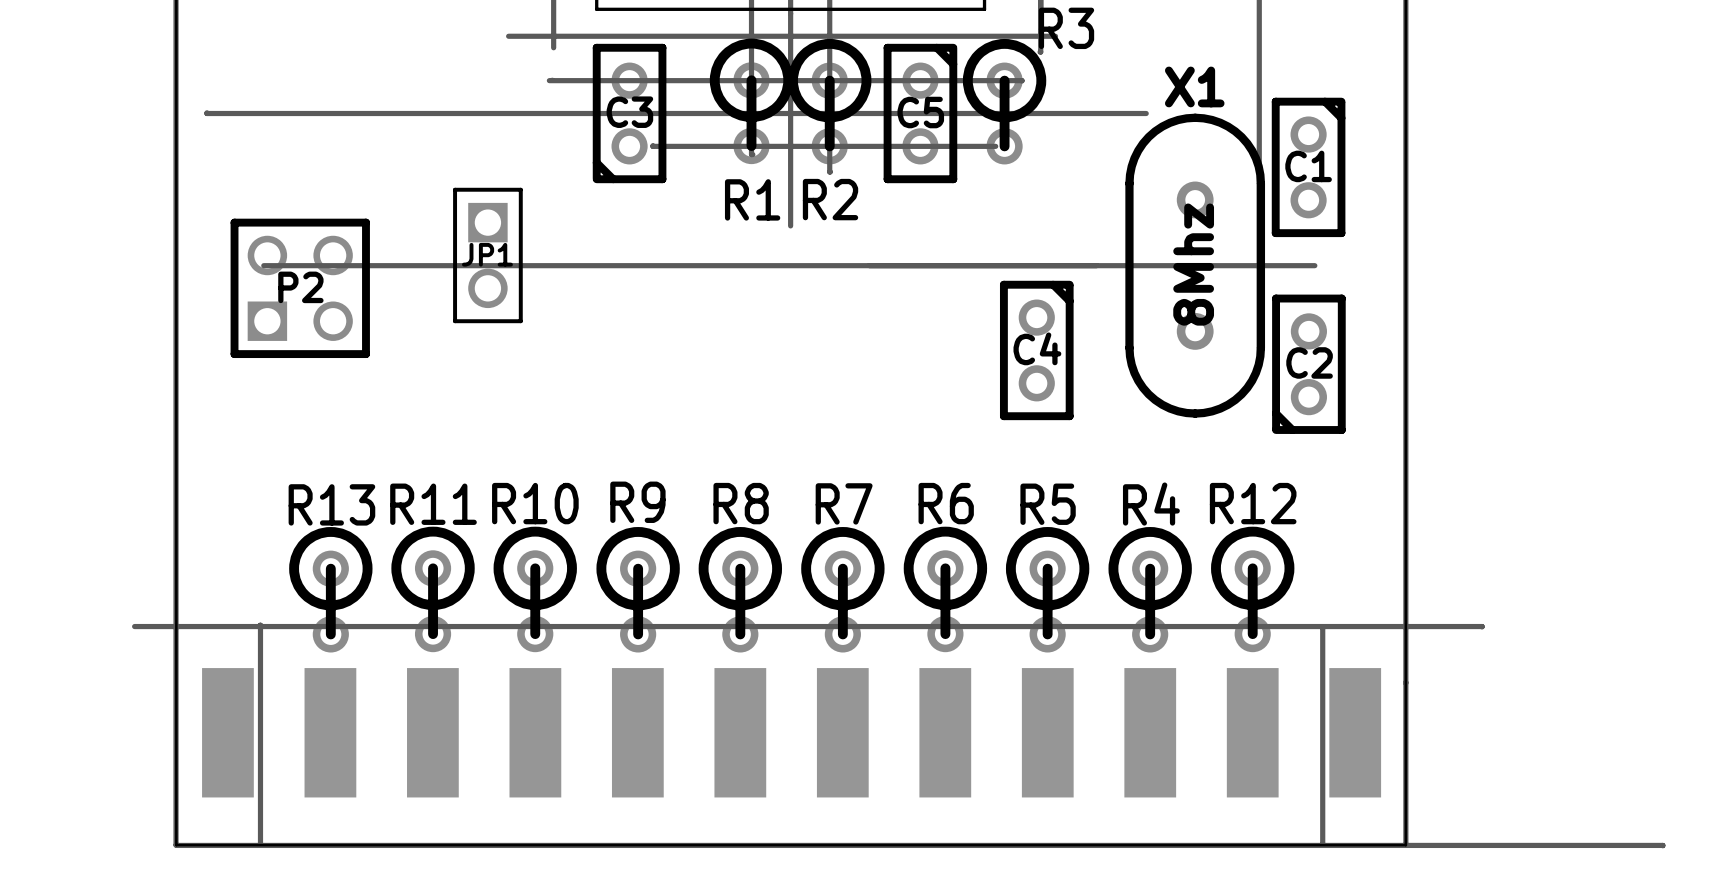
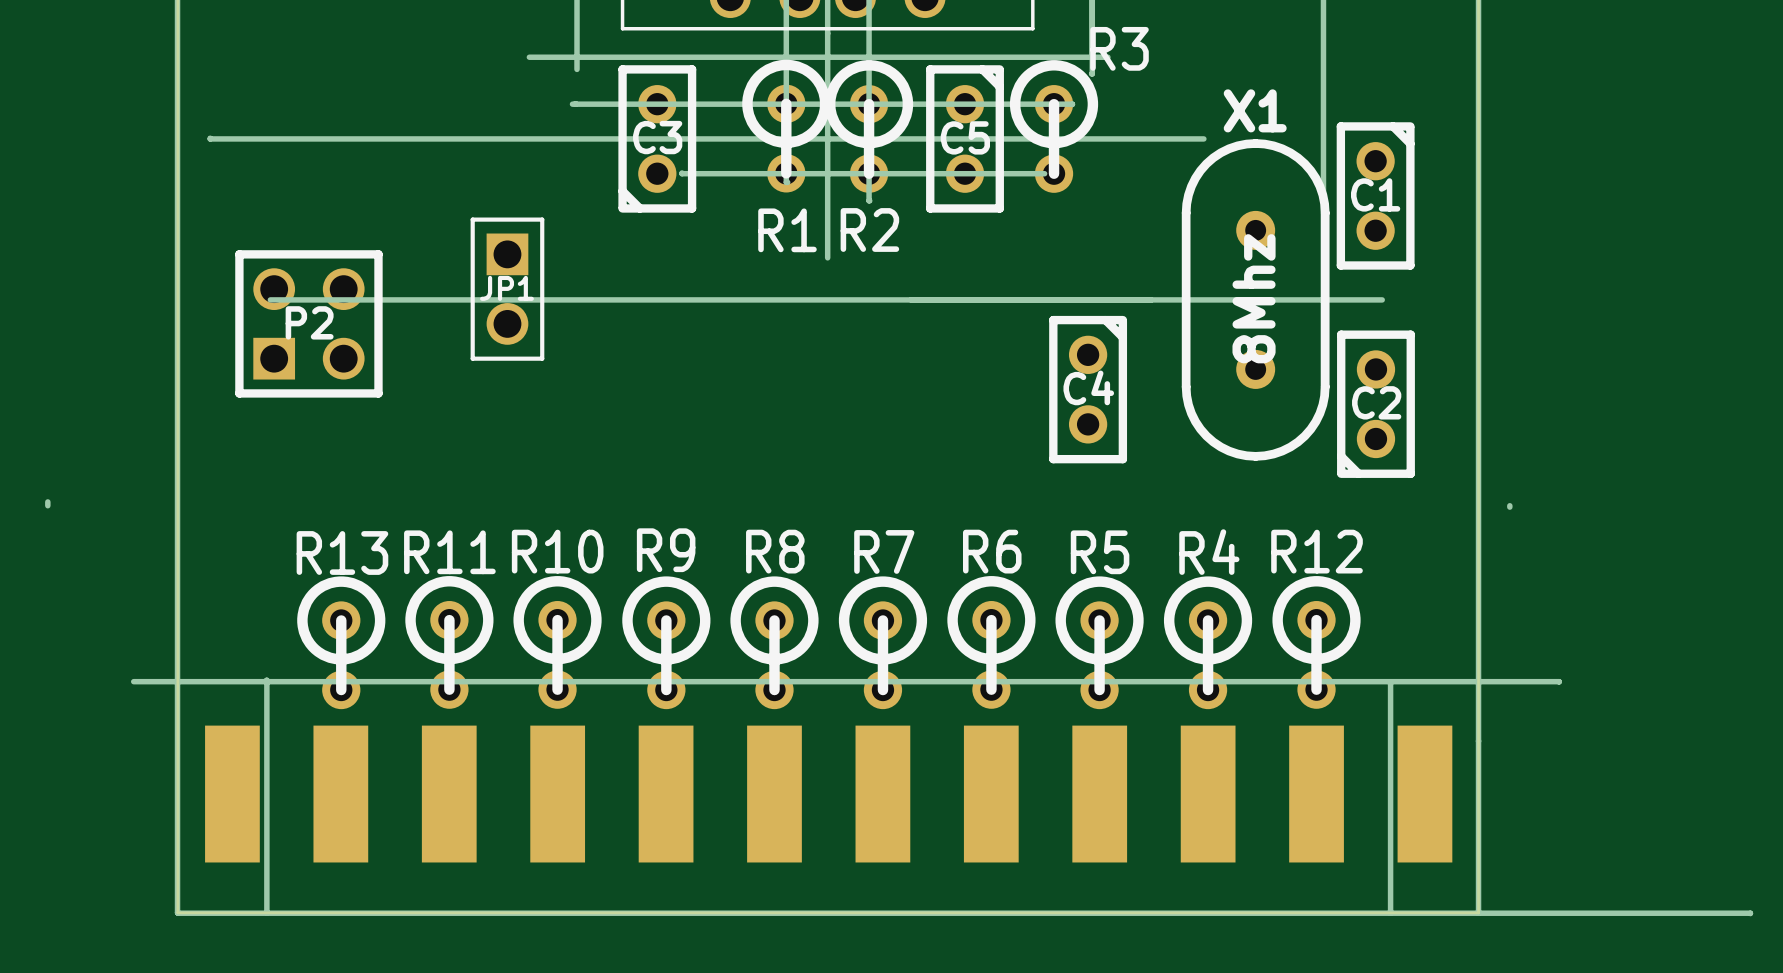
line: none -> (47, 501) (47, 505)
line: none -> (1509, 505) (1509, 507)

